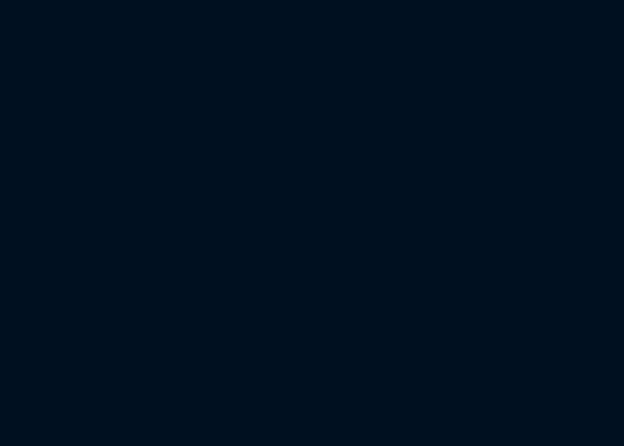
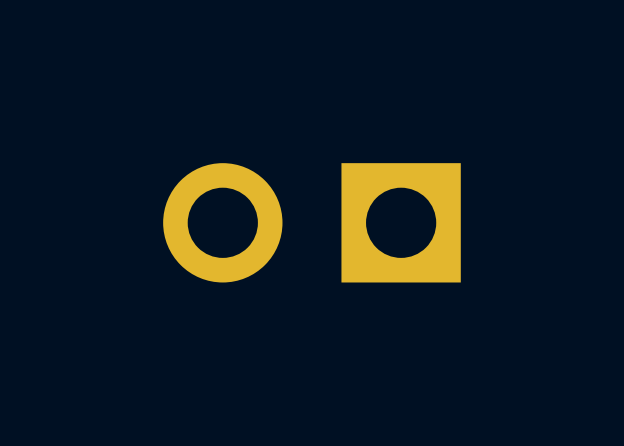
part: none -> (311, 222)

